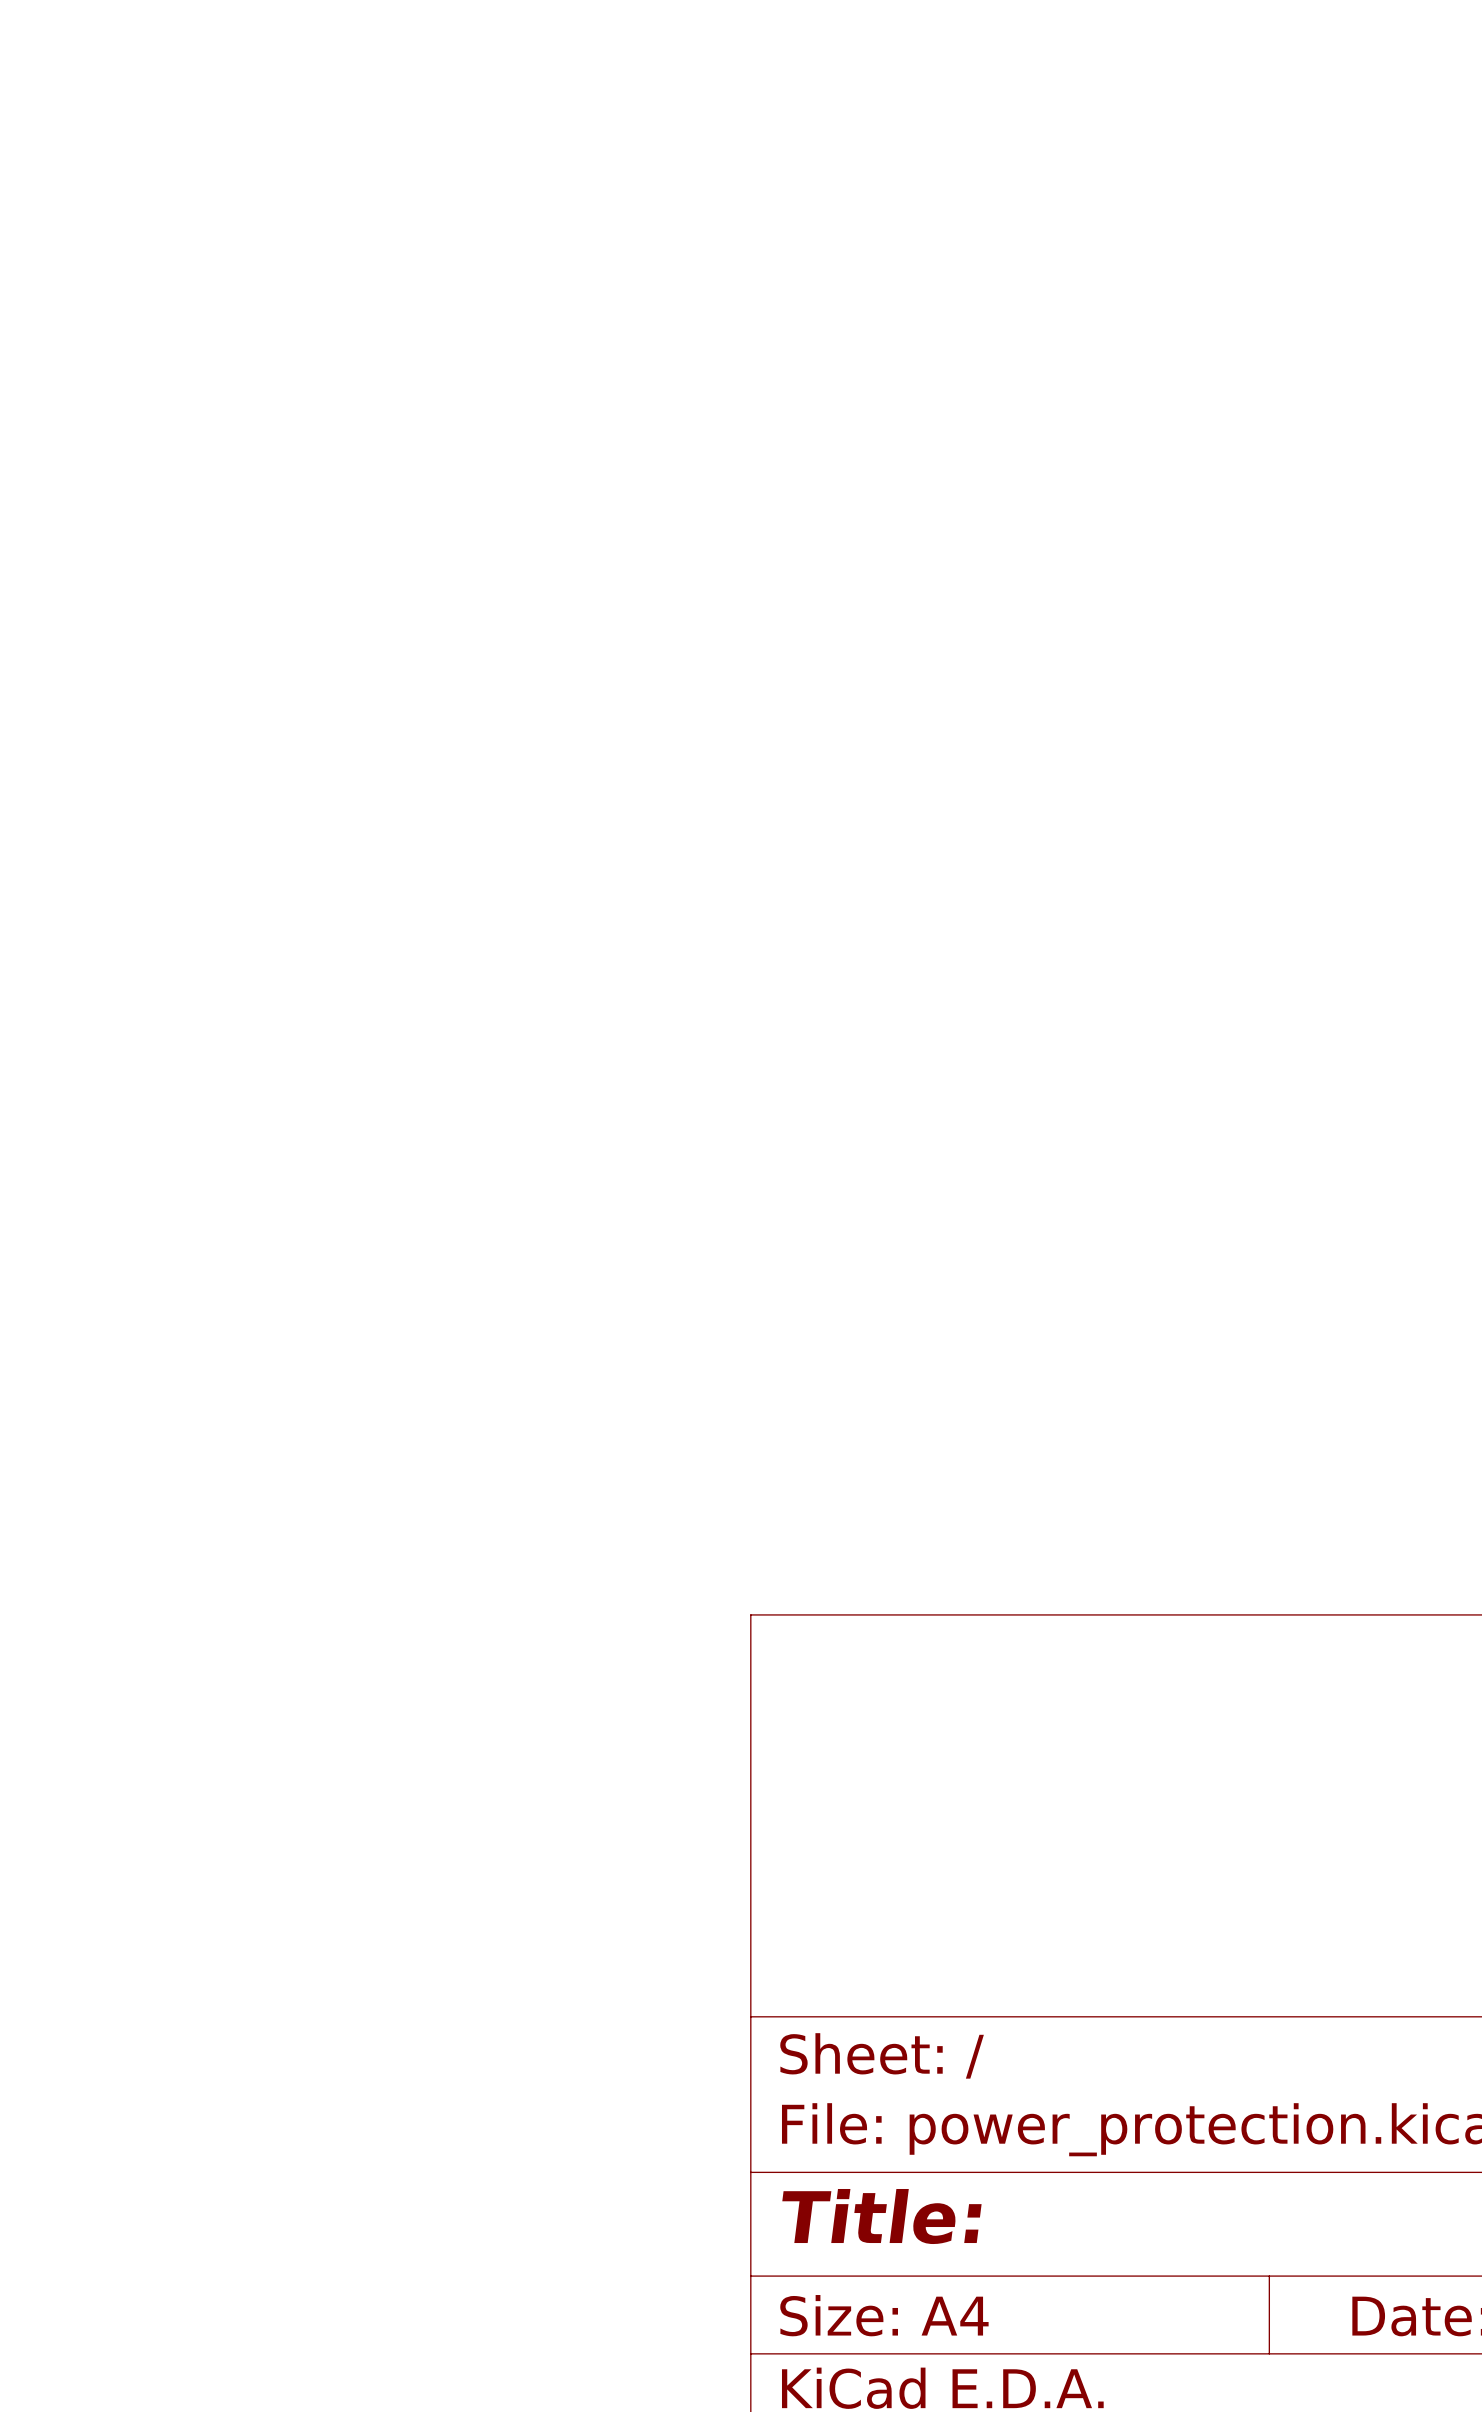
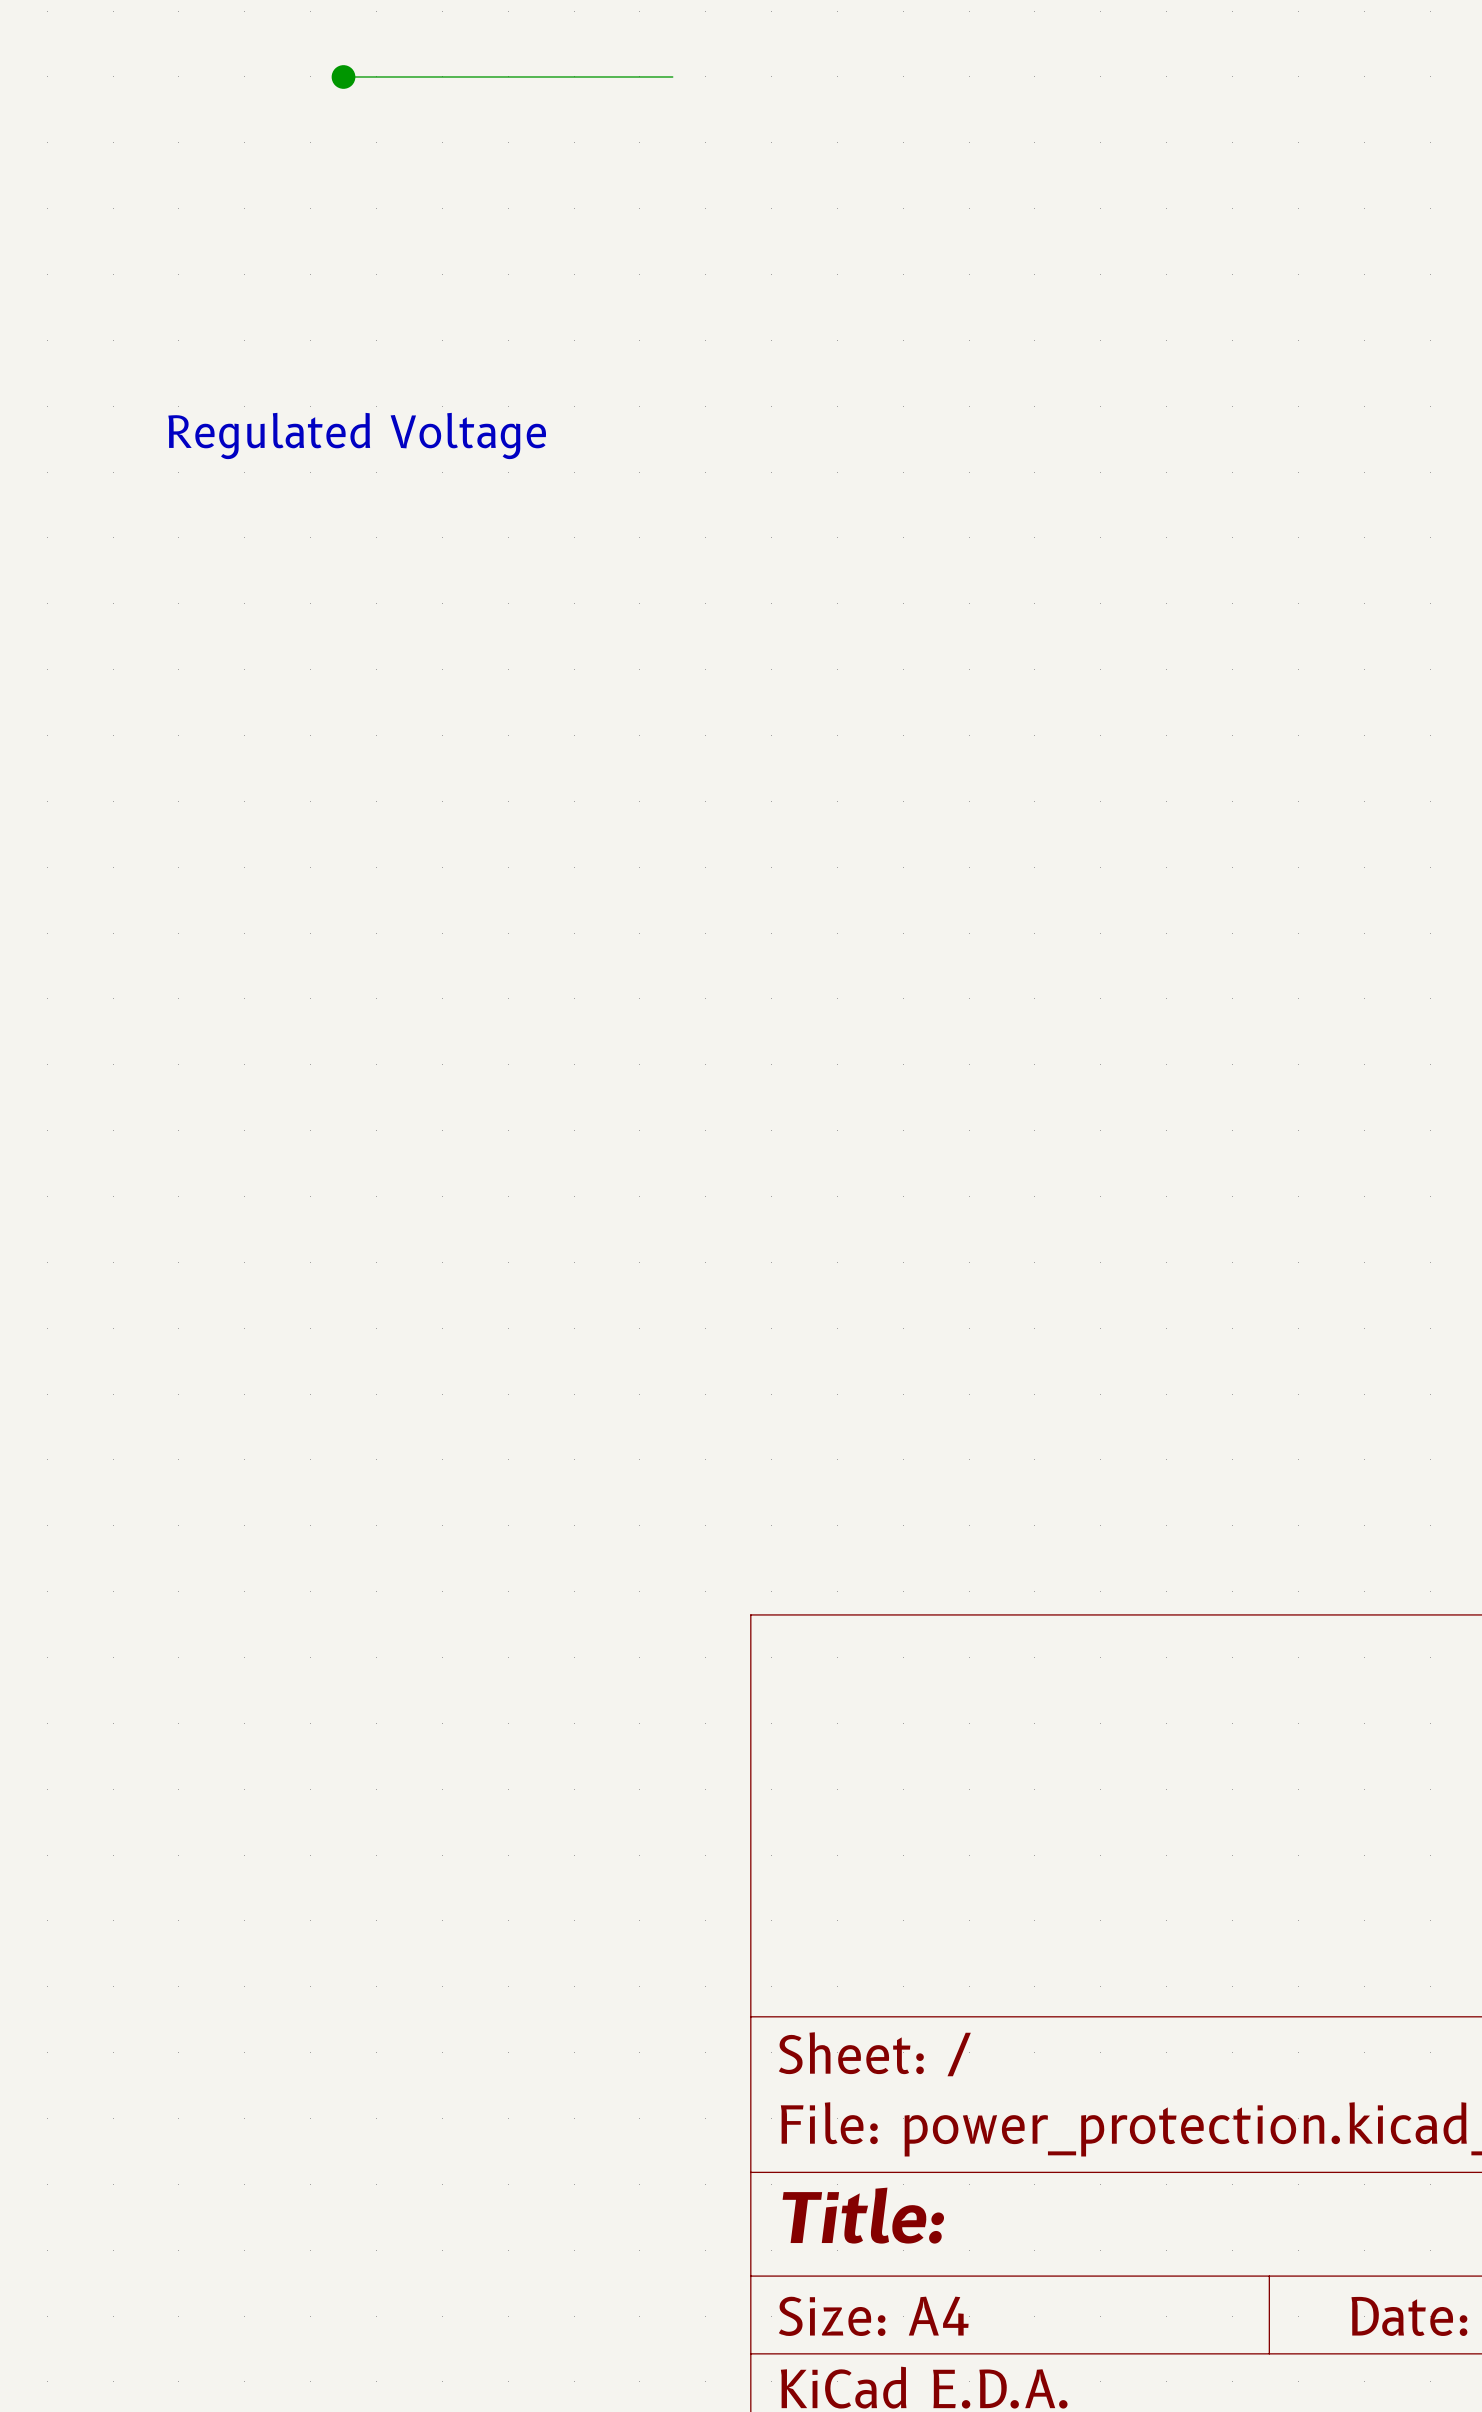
wire: none -> (343, 76) (672, 76)
junction: none -> (343, 76)
text: none -> Regulated Voltage (357, 435)

